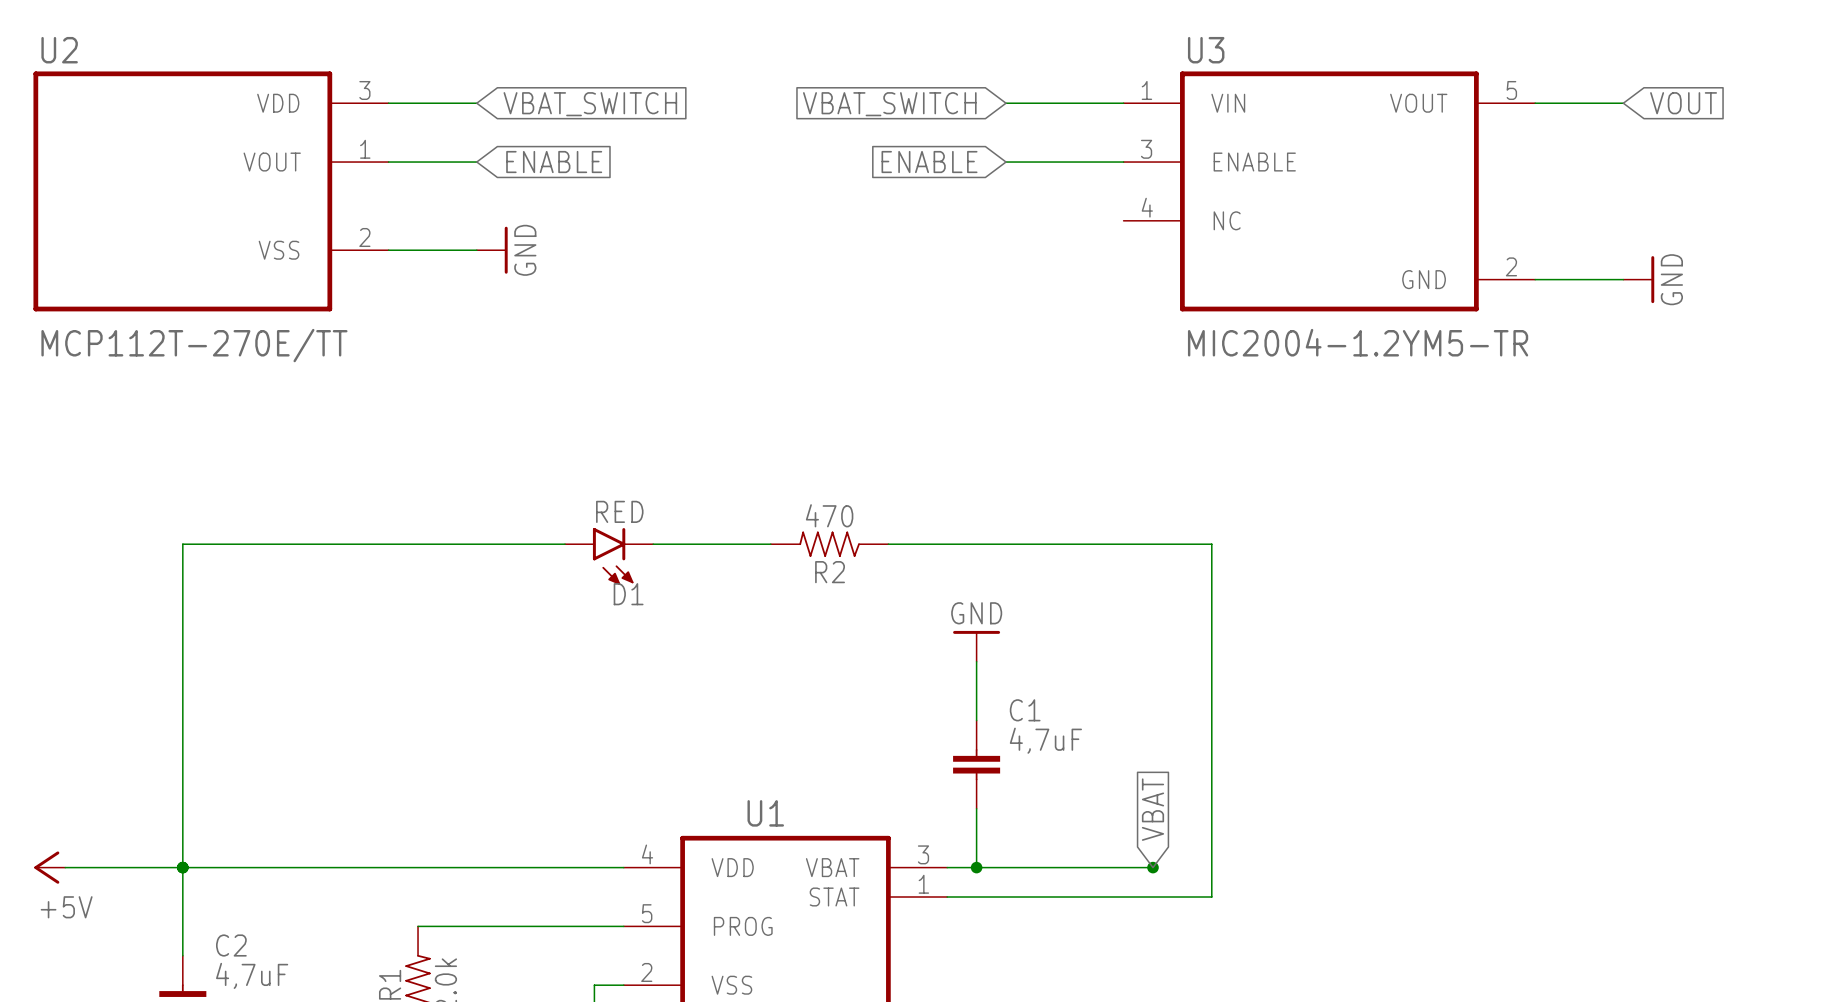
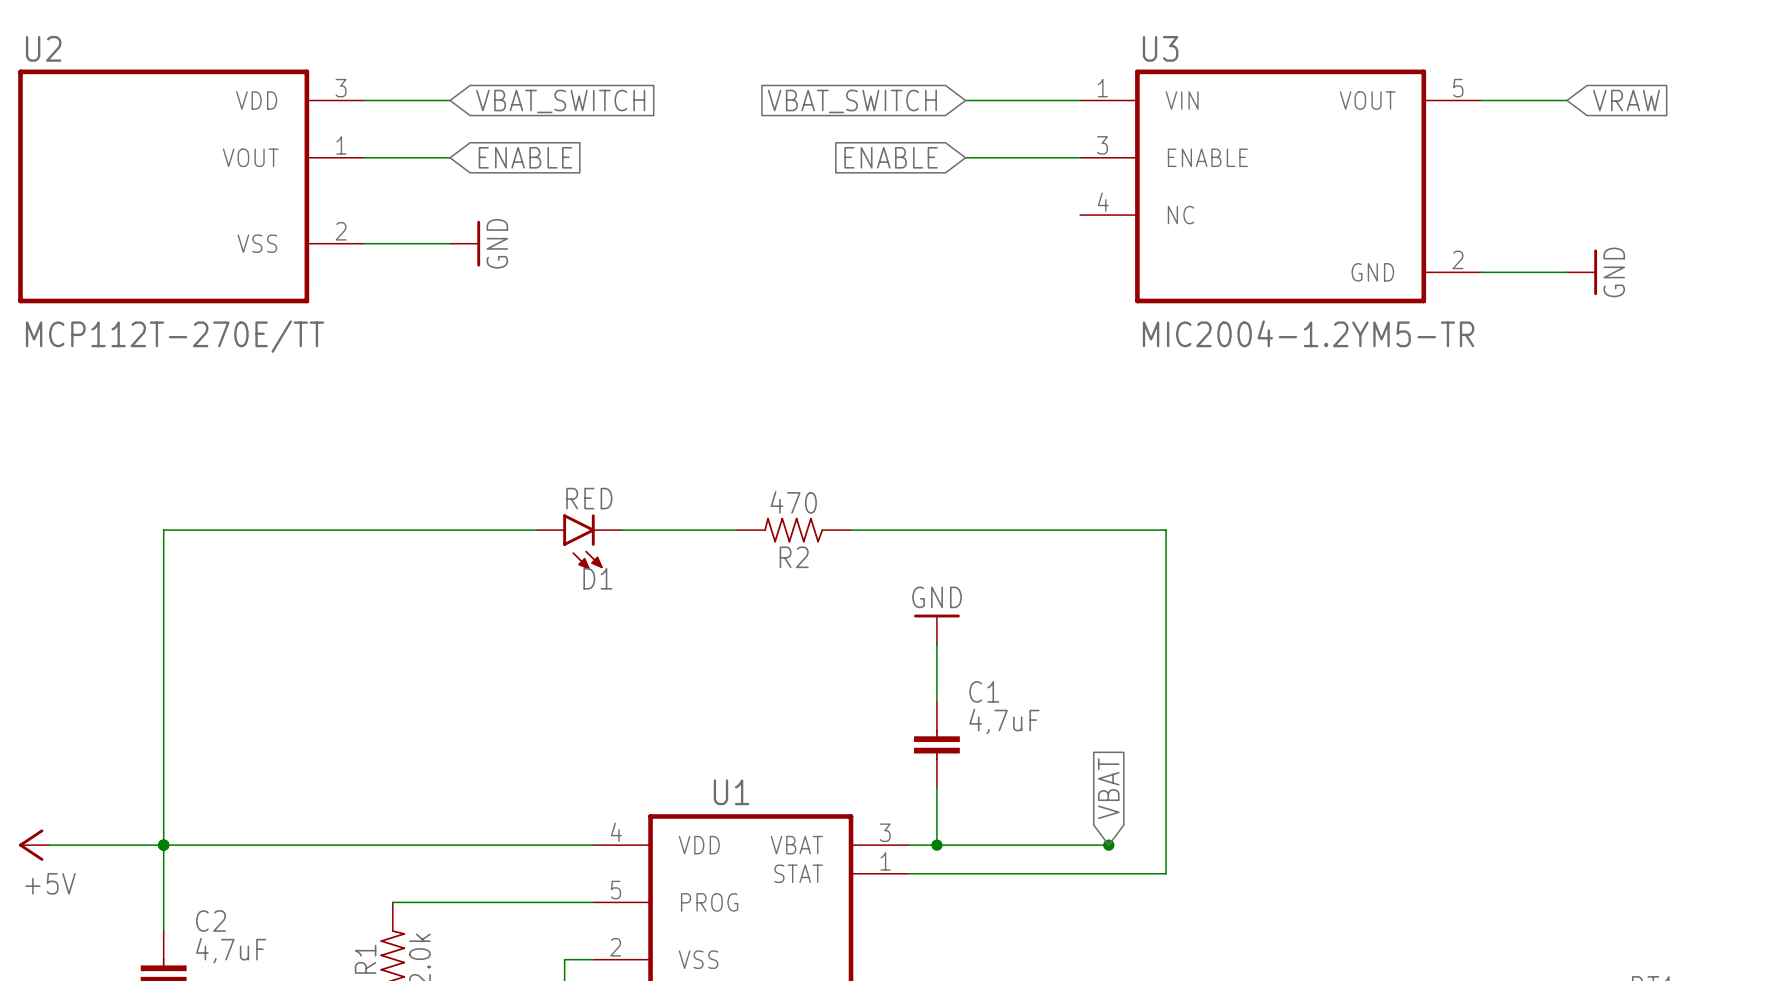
global label: VOUT (1683, 103) -> VRAW (1626, 100)

